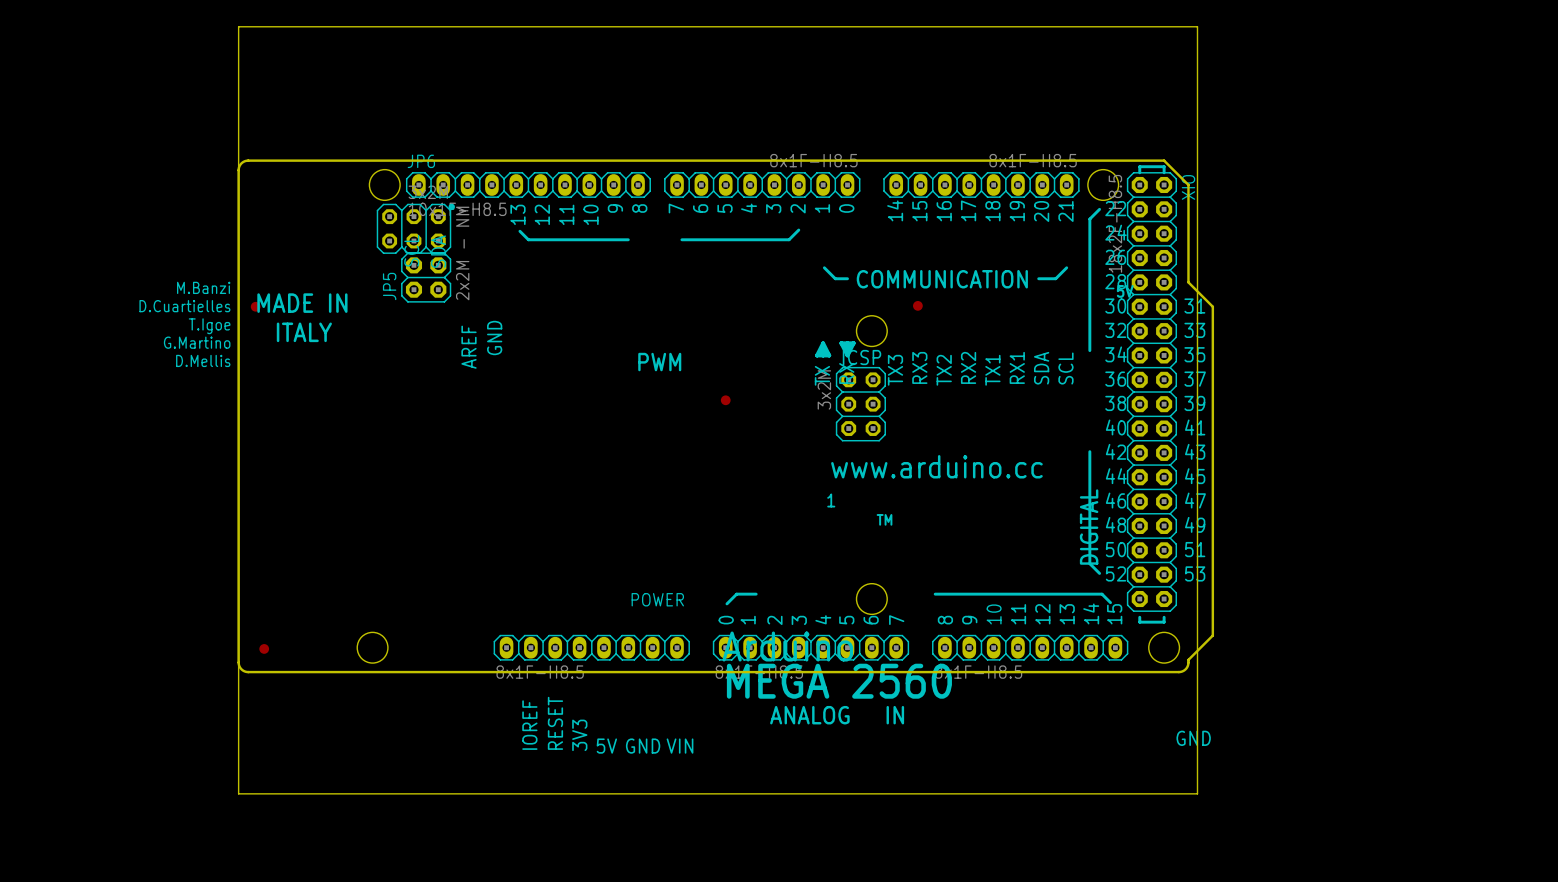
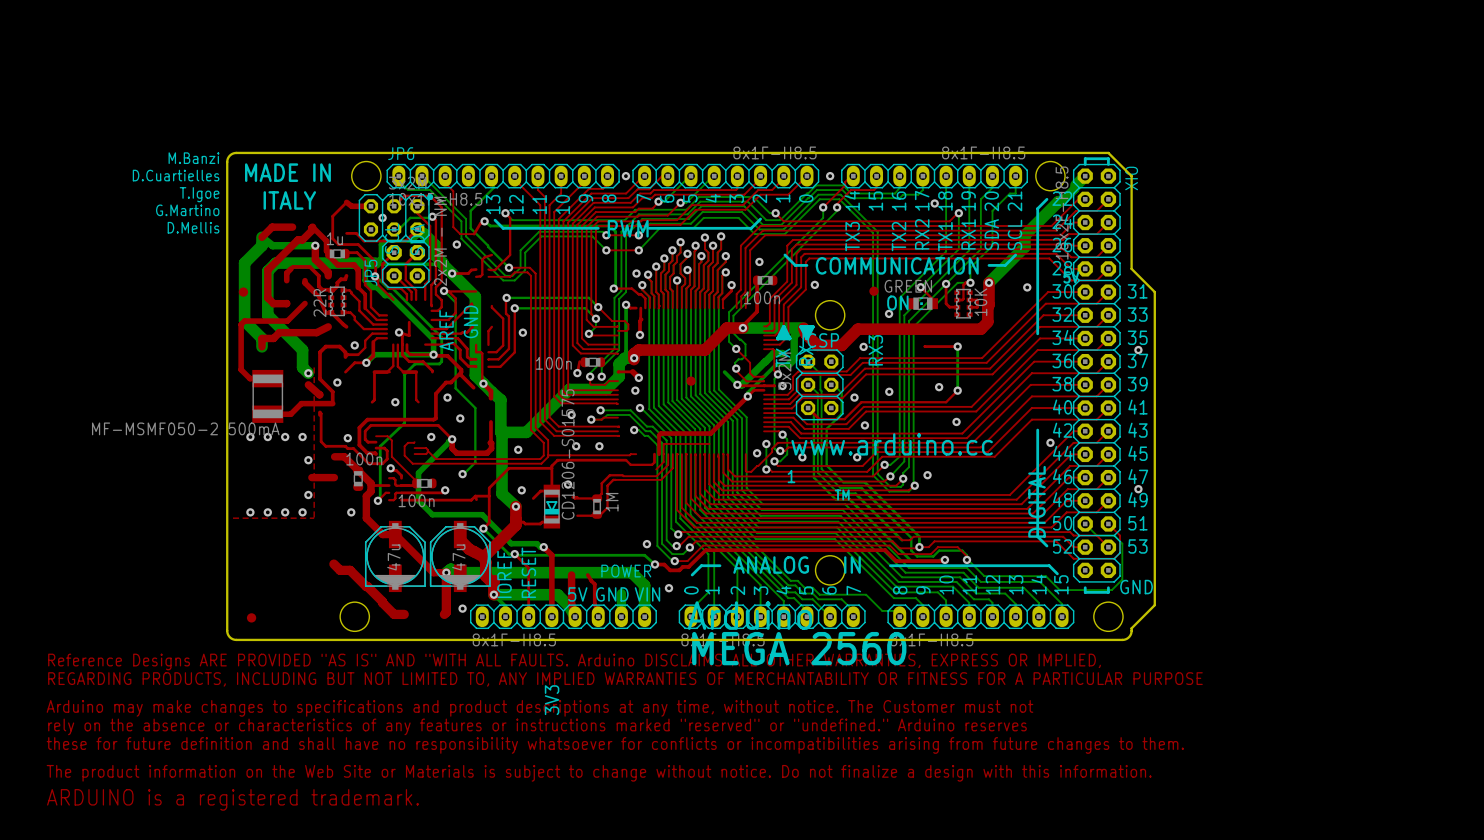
board edge: (238, 26) (238, 793) (1197, 793) (1197, 26) (238, 26) -> none
bottom track: none -> (398, 176) (398, 180) (408, 190) (430, 190) (461, 221) (461, 238) (503, 280) (514, 280) (525, 270) (525, 252) (541, 236) (592, 236) (606, 250)
bottom track: none -> (422, 176) (466, 219) (466, 236) (505, 275) (512, 275) (520, 267) (520, 250) (539, 231) (602, 231) (606, 235)
top track: none -> (445, 176) (445, 183) (453, 191) (453, 227) (460, 234) (474, 234) (480, 223) (484, 221)
bottom track: none -> (491, 176) (493, 187) (470, 210) (470, 228) (508, 267)
top track: none -> (514, 176) (517, 181) (540, 205) (540, 421) (554, 435) (619, 435)
top track: none -> (537, 176) (537, 190) (544, 197) (544, 419) (556, 431) (617, 431)
top track: none -> (561, 176) (561, 193) (549, 205) (549, 417) (558, 426) (617, 426)
top track: none -> (584, 176) (584, 181) (554, 212) (554, 396) (561, 403) (617, 403)
top track: none -> (607, 176) (607, 184) (602, 188) (588, 188) (558, 219) (558, 394) (564, 399) (617, 399)
via: none -> (625, 176)
top track: none -> (644, 176) (626, 193) (591, 193) (563, 221) (563, 391) (566, 394) (617, 394)
top track: none -> (667, 176) (662, 176) (649, 189) (637, 189) (628, 198) (592, 198) (568, 222) (568, 389) (617, 390)
bottom track: none -> (691, 176) (664, 201) (658, 201)
bottom track: none -> (714, 176) (686, 202) (680, 202)
top track: none -> (737, 176) (736, 190) (653, 190) (650, 193) (639, 193) (630, 202) (593, 202) (572, 223) (572, 345) (580, 353) (617, 353)
top track: none -> (760, 176) (760, 178) (744, 194) (655, 194) (651, 198) (642, 198) (633, 207) (594, 207) (577, 224) (577, 343) (583, 349) (617, 349)
top track: none -> (783, 176) (772, 190) (758, 190) (743, 205) (692, 205) (677, 220) (598, 221) (591, 228) (591, 314) (595, 318)
top track: none -> (806, 176) (788, 194) (760, 194) (745, 209) (695, 209) (680, 224) (599, 225) (595, 229) (595, 304) (612, 321) (624, 321) (628, 324) (626, 330) (617, 330)
via: none -> (830, 176)
top track: none -> (853, 176) (845, 181) (845, 185) (823, 207)
top track: none -> (876, 176) (876, 187) (874, 190) (851, 190) (837, 203) (837, 207)
bottom track: none -> (899, 176) (899, 187) (895, 193) (851, 193) (843, 185) (816, 185) (780, 220) (766, 220) (747, 201) (700, 201) (687, 214) (638, 214) (621, 231) (621, 290) (614, 297) (614, 348) (590, 373) (590, 376)
bottom track: none -> (922, 176) (922, 190) (918, 194) (903, 194) (899, 198) (850, 198) (842, 190) (816, 190) (781, 224) (762, 224) (744, 206) (701, 206) (688, 219) (642, 219) (626, 235) (626, 292) (619, 299) (619, 350) (601, 367) (601, 376)
bottom track: none -> (946, 176) (946, 251) (899, 297) (899, 456) (890, 464) (884, 464)
bottom track: none -> (969, 176) (969, 250) (904, 315) (904, 461) (890, 476)
bottom track: none -> (992, 176) (992, 187) (980, 199) (980, 249) (908, 321) (908, 467) (903, 472) (903, 484) (900, 486) (890, 486) (877, 474) (877, 231) (840, 194) (818, 194) (783, 229) (759, 229) (742, 212) (702, 212) (691, 223) (650, 223) (638, 235)
bottom track: none -> (1015, 176) (1015, 193) (1009, 193) (992, 210) (992, 245) (970, 267) (970, 282) (957, 282) (913, 326) (914, 485) (908, 491) (889, 491) (873, 475) (873, 232) (839, 199) (819, 199) (784, 234) (754, 234) (738, 217) (703, 217) (693, 228) (659, 228) (638, 250)
bottom track: none -> (1085, 176) (1064, 199) (1058, 201) (1024, 235) (1024, 246) (989, 282)
top track: none -> (1085, 199) (1078, 199) (1051, 225) (760, 225) (740, 245) (740, 289) (736, 293) (736, 308)
top track: none -> (1108, 199) (1096, 210) (1075, 210) (1056, 230) (762, 230) (745, 248) (745, 292) (741, 296) (741, 308)
top track: none -> (658, 201) (652, 208) (638, 208) (635, 212) (595, 212) (582, 225) (582, 338) (588, 344) (617, 344)
via: none -> (658, 201)
top track: none -> (680, 202) (667, 215) (597, 216) (586, 227) (586, 319) (593, 326) (617, 326)
via: none -> (680, 202)
via: none -> (934, 203)
top track: none -> (364, 206) (370, 206) (351, 206) (346, 202) (332, 216) (332, 238) (338, 244) (358, 244) (375, 261) (375, 277)
top track: none -> (394, 206) (404, 195) (430, 195) (441, 207) (441, 281) (435, 287) (435, 294) (441, 300) (441, 307) (438, 310) (431, 310)
top track: none -> (417, 206) (417, 213) (430, 225) (430, 279) (425, 284) (425, 299)
bottom track: none -> (823, 207) (823, 217) (729, 312) (729, 341) (736, 348)
via: none -> (823, 207)
bottom track: none -> (837, 207) (837, 210) (733, 315) (733, 333) (745, 344) (745, 355) (735, 362) (736, 368)
via: none -> (837, 207)
top track: none -> (505, 213) (510, 217) (510, 254) (495, 270) (488, 269)
bottom track: none -> (505, 213) (512, 220) (624, 220) (635, 209) (686, 209) (699, 197) (753, 197) (769, 213) (775, 213)
via: none -> (505, 213)
top track: none -> (775, 213) (783, 221) (949, 221) (958, 213)
via: none -> (775, 213)
bottom track: none -> (958, 213) (958, 249) (920, 287)
via: none -> (958, 213)
top track: none -> (432, 216) (435, 220) (435, 280) (431, 285) (431, 306)
bottom track: none -> (432, 216) (410, 217) (398, 229) (394, 229)
via: none -> (432, 216)
via: none -> (382, 217)
bottom track: none -> (484, 221) (490, 225) (609, 225) (615, 231) (615, 286) (613, 288)
via: none -> (484, 221)
top track: none -> (1085, 222) (1073, 222) (1060, 235) (765, 235) (750, 250) (750, 294) (745, 298) (745, 308)
top track: none -> (1108, 222) (1096, 234) (1069, 234) (1063, 239) (793, 239) (787, 245) (787, 281) (769, 298) (769, 323) (764, 326)
top track: none -> (292, 227) (272, 227) (262, 237)
top track: none -> (417, 229) (405, 241) (364, 241) (356, 233) (346, 233)
top track: none -> (606, 235) (638, 235)
via: none -> (606, 235)
via: none -> (638, 235)
top track: none -> (721, 236) (721, 249) (717, 252) (717, 263) (713, 267) (713, 290) (709, 294) (709, 308)
bottom track: none -> (721, 236) (721, 249) (717, 252) (717, 263) (713, 267) (713, 290) (709, 294) (709, 391) (737, 419) (737, 492) (760, 515) (840, 515) (902, 577) (960, 577) (976, 593) (1005, 593) (1015, 603) (1015, 616)
via: none -> (721, 236)
top track: none -> (704, 237) (704, 249) (708, 252) (708, 260) (703, 265) (703, 288) (700, 292) (700, 308)
bottom track: none -> (704, 237) (704, 249) (708, 252) (708, 260) (703, 265) (703, 288) (700, 292) (700, 394) (728, 421) (728, 497) (758, 527) (837, 527) (896, 586) (953, 586) (969, 602) (969, 616)
via: none -> (704, 237)
top track: none -> (680, 242) (680, 252) (673, 265) (673, 273) (670, 277) (672, 308)
bottom track: none -> (680, 242) (680, 252) (673, 265) (673, 273) (670, 277) (670, 288) (672, 290) (672, 401) (700, 428) (700, 510) (788, 598) (794, 598) (806, 610) (806, 616)
via: none -> (680, 242)
via: none -> (456, 244)
top track: none -> (315, 245) (315, 259) (328, 272) (328, 275)
bottom track: none -> (315, 245) (272, 245) (262, 237) (262, 245) (244, 263) (244, 321) (262, 338) (262, 346)
via: none -> (315, 245)
top track: none -> (695, 245) (694, 286) (691, 289) (691, 308)
bottom track: none -> (695, 245) (694, 286) (691, 289) (691, 396) (718, 424) (718, 501) (755, 539) (834, 539) (893, 598) (915, 598) (922, 605) (922, 616)
via: none -> (695, 245)
top track: none -> (713, 245) (713, 261) (708, 266) (708, 289) (704, 293) (704, 308)
bottom track: none -> (713, 245) (713, 261) (708, 266) (708, 289) (704, 293) (704, 392) (732, 420) (732, 494) (759, 521) (838, 521) (898, 581) (956, 581) (973, 599) (989, 599) (992, 602) (992, 616)
via: none -> (713, 245)
top track: none -> (1085, 245) (796, 244) (791, 249) (791, 282) (774, 300) (774, 329) (764, 330)
top track: none -> (1108, 245) (1096, 257) (1071, 257) (1063, 249) (801, 249) (796, 253) (796, 284) (779, 302) (779, 331) (775, 335) (764, 335)
top track: none -> (606, 250) (638, 250)
via: none -> (606, 250)
via: none -> (638, 250)
top track: none -> (672, 250) (672, 260) (668, 264) (668, 271) (665, 274) (668, 308)
bottom track: none -> (672, 250) (672, 260) (668, 264) (668, 271) (665, 274) (665, 289) (668, 292) (668, 402) (695, 429) (695, 512) (783, 600) (783, 617)
via: none -> (672, 250)
top track: none -> (394, 252) (382, 264) (382, 281) (389, 288) (401, 288) (406, 294) (406, 299)
top track: none -> (417, 252) (405, 264) (405, 280) (416, 290) (416, 299)
part: none -> 1u (337, 253)
top track: none -> (345, 253) (357, 252) (365, 260) (365, 285) (370, 290) (370, 307) (379, 315) (386, 315)
top track: none -> (687, 253) (687, 257) (680, 264) (680, 273) (685, 278) (685, 283) (681, 287) (681, 308)
bottom track: none -> (687, 253) (687, 257) (680, 264) (680, 273) (685, 278) (685, 283) (681, 287) (681, 398) (709, 426) (709, 506) (788, 585) (795, 585) (803, 593) (812, 593) (818, 599) (841, 599) (853, 610)
via: none -> (687, 253)
top track: none -> (491, 254) (482, 259) (482, 274) (476, 276)
top track: none -> (701, 256) (701, 261) (699, 264) (699, 287) (695, 290) (695, 308)
bottom track: none -> (701, 256) (701, 261) (699, 264) (699, 287) (695, 290) (695, 395) (723, 423) (723, 499) (757, 533) (835, 533) (895, 592) (937, 592) (946, 600) (946, 616)
via: none -> (701, 256)
top track: none -> (725, 256) (725, 261) (717, 270) (717, 292) (713, 295) (713, 308)
bottom track: none -> (725, 256) (725, 261) (717, 270) (717, 292) (714, 295) (714, 390) (742, 418) (742, 490) (761, 510) (842, 510) (905, 572) (963, 572) (978, 587) (1023, 587) (1038, 602) (1038, 616)
via: none -> (725, 256)
top track: none -> (664, 258) (664, 270) (660, 273) (663, 308)
bottom track: none -> (664, 258) (664, 270) (660, 273) (660, 290) (663, 294) (663, 404) (690, 431) (690, 514) (760, 584) (760, 616)
via: none -> (664, 258)
via: none -> (759, 261)
bottom track: none -> (365, 263) (365, 280) (372, 287) (376, 287) (384, 295) (389, 295) (433, 339) (433, 354) (374, 354) (366, 362)
bottom track: none -> (375, 263) (275, 263) (267, 271) (267, 315) (302, 350) (302, 367) (308, 373)
bottom track: none -> (375, 263) (381, 258) (381, 244) (384, 241) (411, 241) (417, 235) (417, 229) (435, 245) (435, 256) (442, 263)
bottom track: none -> (375, 263) (442, 263)
bottom track: none -> (442, 263) (475, 296) (475, 375) (500, 399) (500, 432) (526, 432) (569, 389) (606, 389) (619, 376) (619, 363) (624, 358) (634, 359) (626, 351) (626, 304)
top track: none -> (656, 266) (658, 308)
bottom track: none -> (656, 266) (656, 292) (658, 294) (658, 405) (685, 432) (685, 517) (737, 568) (737, 616)
via: none -> (656, 266)
top track: none -> (508, 267) (529, 267) (535, 273) (535, 427) (548, 440) (548, 456) (541, 463) (412, 463) (404, 455) (404, 446) (408, 442) (414, 442)
via: none -> (508, 267)
top track: none -> (1085, 268) (1071, 268) (1056, 253) (804, 253) (801, 257) (801, 287) (783, 304) (783, 333) (777, 340) (764, 340)
top track: none -> (1108, 268) (1096, 280) (1071, 280) (1049, 258) (809, 258) (805, 261) (805, 289) (788, 307) (788, 336) (779, 344) (764, 344)
top track: none -> (476, 269) (471, 270) (468, 273) (452, 273)
top track: none -> (687, 270) (689, 272) (689, 285) (686, 288) (686, 308)
bottom track: none -> (687, 270) (689, 272) (689, 285) (686, 288) (686, 397) (714, 425) (714, 504) (790, 580) (797, 580) (804, 587) (812, 587) (819, 594) (866, 594) (882, 610) (899, 610) (899, 616)
via: none -> (687, 270)
top track: none -> (725, 272) (722, 275) (722, 293) (718, 297) (718, 308)
bottom track: none -> (725, 272) (722, 275) (722, 293) (718, 296) (718, 389) (746, 417) (746, 488) (762, 504) (845, 504) (908, 568) (966, 568) (980, 581) (1040, 581) (1062, 603) (1062, 616)
via: none -> (725, 272)
text position: M.Banzi (203, 287) -> M.Banzi (193, 158)
via: none -> (452, 273)
via: none -> (636, 273)
top track: none -> (648, 274) (648, 278) (651, 281) (651, 293) (654, 296) (654, 308)
bottom track: none -> (648, 274) (648, 278) (651, 281) (651, 293) (653, 295) (653, 407) (680, 434) (680, 518) (714, 552) (714, 616)
via: none -> (648, 274)
top track: none -> (346, 275) (345, 279) (340, 279) (337, 282) (337, 286) (333, 290) (322, 289) (318, 286) (318, 275) (309, 266) (292, 266) (286, 273) (286, 280)
top track: none -> (394, 275) (411, 292) (411, 299)
top track: none -> (375, 276) (377, 279) (377, 284) (393, 299)
bottom track: none -> (375, 276) (388, 288) (392, 288) (441, 337) (441, 361) (439, 363) (415, 363) (404, 374) (404, 423) (380, 446) (380, 500) (377, 500)
via: none -> (375, 276)
top track: none -> (488, 276) (510, 276) (514, 272) (527, 272) (531, 275) (531, 430) (543, 442) (543, 455) (540, 459) (435, 459) (427, 450)
top track: none -> (305, 280) (318, 296) (325, 312) (331, 312) (346, 326)
top track: none -> (677, 280) (677, 308)
bottom track: none -> (677, 280) (677, 399) (704, 427) (704, 507) (788, 592) (795, 592) (802, 599) (812, 599) (830, 616)
via: none -> (677, 280)
top track: none -> (757, 280) (757, 311) (742, 328) (726, 328) (704, 350) (638, 350) (633, 353) (633, 361) (634, 358)
part: none -> 100n (765, 280)
top track: none -> (970, 282) (963, 285) (963, 299) (957, 300)
via: none -> (970, 282)
top track: none -> (989, 282) (987, 322) (980, 329) (857, 329) (841, 345) (817, 345) (805, 333) (803, 328)
via: none -> (989, 282)
top track: none -> (946, 283) (946, 303) (949, 307) (957, 307)
via: none -> (946, 283)
top track: none -> (642, 285) (642, 289) (649, 297) (649, 308)
bottom track: none -> (642, 285) (642, 289) (649, 296) (649, 409) (675, 435) (675, 521) (708, 554) (708, 592) (691, 609) (691, 616)
via: none -> (642, 285)
top track: none -> (731, 285) (731, 290) (722, 299) (723, 308)
via: none -> (731, 285)
via: none -> (814, 284)
top track: none -> (920, 287) (932, 298) (932, 303)
via: none -> (920, 287)
via: none -> (1027, 287)
text position: MADE IN (302, 303) -> MADE IN (287, 172)
top track: none -> (613, 288) (631, 288) (645, 298) (645, 308)
via: none -> (613, 288)
top track: none -> (343, 290) (349, 290) (359, 301) (359, 310) (373, 324) (386, 324)
top track: none -> (444, 290) (476, 291)
bottom track: none -> (444, 290) (455, 302) (455, 388) (475, 408) (475, 462) (462, 474)
via: none -> (444, 290)
text position: D.Cuartielles (184, 306) -> D.Cuartielles (176, 175)
top track: none -> (448, 291) (455, 298) (455, 312) (448, 319) (431, 319)
top track: none -> (1085, 292) (1048, 292) (982, 358) (860, 358) (846, 371) (798, 371) (793, 376) (793, 389) (787, 394) (764, 394)
top track: none -> (1108, 292) (1096, 303) (1045, 303) (986, 362) (862, 362) (850, 374) (800, 374) (797, 377) (797, 390) (788, 399) (764, 399)
top track: none -> (506, 297) (508, 348) (498, 359) (488, 359)
bottom track: none -> (506, 297) (588, 297) (598, 307)
via: none -> (506, 297)
top track: none -> (969, 300) (977, 300) (977, 307) (969, 307)
part: none -> 22R (337, 301)
top track: none -> (286, 303) (273, 303) (267, 297) (267, 270) (297, 239) (302, 239) (311, 230) (312, 227) (326, 241) (328, 255) (337, 264) (354, 264) (358, 270) (358, 287) (365, 294) (365, 308) (376, 319) (386, 319)
top track: none -> (305, 303) (287, 321) (244, 321) (241, 324) (241, 369) (249, 378) (267, 378)
ON: none -> GREEN (922, 303)
part: none -> 10K (963, 303)
top track: none -> (626, 304) (630, 308) (636, 308)
via: none -> (626, 304)
top track: none -> (472, 305) (471, 303) (446, 329) (431, 329)
top track: none -> (491, 305) (503, 318) (503, 345) (496, 352) (488, 352)
via: none -> (598, 307)
top track: none -> (514, 308) (514, 352) (500, 366) (488, 366)
bottom track: none -> (514, 308) (585, 308) (595, 318) (595, 326) (588, 333)
via: none -> (514, 308)
top track: none -> (640, 308) (639, 334)
text position: T.Igoe (209, 326) -> T.Igoe (199, 194)
top track: none -> (343, 312) (350, 312) (363, 329) (386, 329)
via: none -> (889, 313)
top track: none -> (1085, 315) (1043, 315) (990, 368) (864, 368) (838, 394) (799, 394) (790, 403) (764, 403)
top track: none -> (1108, 315) (1096, 326) (1040, 326) (992, 374) (866, 374) (842, 398) (802, 398) (791, 408) (764, 408)
text position: ITALY (304, 332) -> ITALY (289, 200)
via: none -> (595, 318)
top track: none -> (409, 322) (409, 335) (399, 332)
text position: G.Martino (197, 342) -> G.Martino (187, 210)
top track: none -> (328, 326) (316, 332) (279, 332) (273, 338) (262, 338) (262, 346)
top track: none -> (472, 326) (467, 332) (461, 333) (431, 333)
top track: none -> (491, 326) (488, 331) (488, 344)
bottom track: none -> (742, 328) (803, 328) (794, 336) (794, 359) (788, 365) (775, 365) (747, 392) (747, 396)
via: none -> (742, 328)
top track: none -> (399, 332) (402, 335) (402, 354) (409, 361) (423, 361) (432, 372)
via: none -> (399, 332)
via: none -> (522, 332)
top track: none -> (386, 333) (372, 333) (365, 340) (365, 347) (358, 354) (347, 354) (345, 357) (345, 352) (339, 346) (325, 346) (319, 352) (319, 379) (332, 391) (332, 403) (301, 403) (290, 414) (267, 414)
top track: none -> (588, 333) (591, 336) (617, 335)
via: none -> (588, 333)
via: none -> (639, 334)
top track: none -> (386, 338) (377, 338) (373, 341) (373, 355) (366, 362) (354, 362) (345, 372)
top track: none -> (431, 338) (457, 338) (467, 348) (467, 357) (476, 359)
top track: none -> (1085, 338) (1040, 338) (971, 406) (863, 406) (846, 424) (806, 424) (795, 413) (764, 413)
top track: none -> (1108, 338) (1096, 350) (1037, 350) (976, 411) (866, 411) (848, 428) (804, 428) (793, 417) (764, 417)
text position: D.Mellis (203, 360) -> D.Mellis (193, 227)
top track: none -> (393, 344) (393, 366) (387, 372)
top track: none -> (397, 344) (397, 366) (403, 372) (416, 372) (416, 399) (418, 402)
top track: none -> (406, 344) (406, 351) (410, 354) (447, 355) (461, 369) (461, 372)
top track: none -> (425, 344) (453, 343) (460, 350) (460, 358) (468, 366) (476, 366)
via: none -> (354, 345)
top track: none -> (476, 344) (476, 352) (482, 353) (482, 382) (490, 391) (490, 398)
text position: PWM (659, 362) -> PWM (628, 228)
top track: none -> (924, 346) (957, 346)
bottom track: none -> (957, 346) (957, 390)
via: none -> (957, 346)
via: none -> (863, 346)
top track: none -> (736, 348) (750, 362) (750, 373) (753, 376) (764, 376)
via: none -> (736, 348)
top track: none -> (764, 349) (774, 350) (774, 370) (777, 374)
text position: RX2 (968, 367) -> RX2 (922, 234)
text position: RX1 (1017, 367) -> RX1 (968, 234)
via: none -> (1138, 350)
text position: SDA (1041, 368) -> SDA (991, 234)
text position: SCL (1065, 368) -> SCL (1014, 234)
text position: TX3 (895, 370) -> TX3 (852, 236)
text position: TX2 (944, 370) -> TX2 (899, 236)
text position: TX1 (992, 370) -> TX1 (945, 236)
bottom track: none -> (782, 353) (773, 353) (742, 384) (737, 384) (724, 372)
via: none -> (433, 354)
via: none -> (634, 358)
top track: none -> (579, 361) (577, 373)
bottom track: none -> (808, 361) (820, 373) (821, 469) (840, 488) (861, 488) (911, 537) (911, 550) (917, 556) (933, 556) (939, 550) (962, 550) (966, 555) (966, 559) (984, 576) (1045, 576) (1059, 590) (1111, 590) (1122, 579) (1122, 543) (1114, 535) (1096, 535) (1085, 523)
top track: none -> (1085, 361) (1034, 361) (962, 433) (801, 433) (791, 422) (764, 422)
top track: none -> (1108, 361) (1096, 373) (1031, 373) (966, 438) (800, 438) (788, 426) (764, 426)
part: none -> 100n (592, 362)
via: none -> (366, 362)
top zone outline: none -> (314, 367) (314, 518) (233, 518)
top track: none -> (736, 368) (746, 381) (764, 381)
via: none -> (736, 368)
top track: none -> (387, 372) (389, 372)
top track: none -> (387, 372) (374, 372) (374, 399) (372, 402)
top track: none -> (461, 372) (460, 374) (473, 387)
top track: none -> (461, 372) (451, 382) (446, 382) (435, 393) (435, 418) (367, 419) (359, 427) (359, 445) (367, 453) (376, 454)
top track: none -> (617, 372) (632, 371) (638, 377)
via: none -> (577, 373)
via: none -> (308, 373)
bottom track: none -> (777, 374) (774, 379) (774, 448) (780, 450)
via: none -> (777, 374)
top track: none -> (590, 376) (591, 384) (605, 384) (608, 381) (617, 381)
via: none -> (590, 376)
via: none -> (601, 376)
via: none -> (638, 377)
via: none -> (337, 382)
via: none -> (483, 383)
top track: none -> (308, 384) (319, 394)
via: none -> (737, 384)
bottom track: none -> (808, 384) (817, 393) (817, 472) (838, 493) (855, 493) (902, 540)
bottom track: none -> (831, 384) (841, 392) (841, 413) (826, 428) (826, 465) (843, 482) (864, 482) (919, 536) (919, 547)
top track: none -> (1085, 384) (1030, 384) (972, 442) (777, 442) (772, 448) (772, 452) (751, 471) (745, 470) (745, 454)
top track: none -> (1108, 384) (1096, 396) (1031, 396) (980, 447) (788, 447) (784, 450) (780, 450)
top track: none -> (737, 386) (774, 386)
via: none -> (782, 386)
via: none -> (939, 387)
top track: none -> (764, 390) (754, 390) (710, 433) (660, 433) (659, 435) (659, 454)
via: none -> (635, 390)
top track: none -> (957, 390) (946, 402) (861, 402) (844, 419) (819, 419) (808, 408)
via: none -> (957, 390)
via: none -> (889, 391)
part: none -> MF-MSMF050-2 500mA (267, 396)
via: none -> (747, 396)
via: none -> (447, 397)
via: none -> (854, 397)
via: none -> (395, 402)
bottom track: none -> (639, 408) (671, 438) (671, 528) (678, 534)
via: none -> (639, 408)
bottom track: none -> (808, 408) (813, 413) (813, 477) (835, 499) (849, 499) (911, 561) (944, 559)
top track: none -> (1085, 408) (1031, 408) (987, 452) (876, 452) (862, 466) (777, 466) (774, 461)
top track: none -> (1108, 408) (1096, 419) (1031, 419) (994, 456) (882, 456) (867, 471) (772, 471) (766, 469)
bottom track: none -> (600, 410) (630, 410) (646, 426) (652, 426) (666, 440) (666, 540) (672, 546) (676, 546)
via: none -> (600, 410)
top track: none -> (319, 414) (319, 412) (321, 441) (325, 446) (345, 446) (347, 448) (353, 448) (368, 463) (382, 463) (387, 459) (387, 450) (384, 448) (376, 448)
via: none -> (571, 414)
top track: none -> (617, 417) (591, 419)
via: none -> (460, 418)
bottom track: none -> (591, 419) (601, 419) (607, 414) (629, 414) (645, 431) (650, 431) (662, 442) (662, 543) (672, 554) (683, 554) (689, 547)
via: none -> (591, 419)
top track: none -> (490, 421) (491, 448) (486, 453) (456, 453) (452, 448) (452, 439) (438, 425) (370, 425) (365, 431) (365, 439) (368, 442) (376, 442)
via: none -> (956, 421)
via: none -> (864, 425)
bottom track: none -> (634, 430) (638, 430) (644, 435) (648, 435) (657, 445) (657, 546) (672, 561) (674, 561)
via: none -> (634, 430)
top track: none -> (1085, 431) (1073, 431) (1009, 494) (720, 494) (709, 484) (709, 454)
top track: none -> (1108, 431) (1096, 442) (1073, 442) (1016, 499) (715, 499) (704, 489) (704, 454)
top track: none -> (764, 431) (779, 431) (782, 434)
bottom track: none -> (502, 432) (502, 493) (515, 506)
bottom track: none -> (782, 434) (787, 439) (787, 454) (780, 461) (774, 461)
via: none -> (782, 434)
via: none -> (250, 437)
via: none -> (267, 437)
via: none -> (285, 437)
via: none -> (302, 437)
top track: none -> (376, 436) (387, 436) (391, 440) (391, 456) (416, 481) (416, 483) (414, 485) (396, 485) (395, 479) (389, 478)
via: none -> (431, 437)
via: none -> (347, 438)
bottom track: none -> (452, 439) (418, 472) (418, 500) (432, 514) (482, 514) (511, 543) (536, 543) (540, 547) (543, 547)
via: none -> (452, 439)
via: none -> (1050, 442)
top track: none -> (709, 443) (664, 443) (663, 462) (656, 469)
bottom track: none -> (766, 443) (766, 469)
via: none -> (766, 443)
via: none -> (576, 446)
via: none -> (599, 446)
top track: none -> (414, 448) (427, 449) (426, 454) (414, 454)
via: none -> (518, 449)
via: none -> (780, 450)
top track: none -> (636, 454) (548, 455)
top track: none -> (654, 454) (654, 462) (652, 464) (630, 464) (626, 460) (557, 460) (551, 466) (551, 491) (540, 491) (533, 498)
top track: none -> (668, 454) (668, 464) (656, 476) (609, 475) (601, 483) (601, 493) (597, 498) (573, 497)
top track: none -> (672, 454) (672, 468) (661, 479) (613, 479) (607, 485) (607, 507) (600, 514) (577, 515)
top track: none -> (677, 454) (677, 510) (694, 527) (1051, 527) (1066, 512) (1096, 512) (1108, 500)
top track: none -> (681, 454) (681, 507) (696, 522) (1044, 522) (1066, 500) (1085, 500)
top track: none -> (686, 454) (686, 503) (701, 518) (1038, 518) (1067, 489) (1096, 489) (1108, 477)
top track: none -> (691, 454) (691, 498) (706, 513) (1033, 513) (1069, 477) (1085, 477)
top track: none -> (695, 454) (695, 496) (708, 508) (1027, 508) (1070, 466) (1096, 466) (1108, 454)
top track: none -> (700, 454) (700, 493) (710, 504) (1021, 504) (1071, 454) (1085, 454)
top track: none -> (713, 454) (713, 481) (722, 490) (908, 490) (914, 485)
top track: none -> (718, 454) (718, 479) (724, 485) (896, 485) (903, 478)
top track: none -> (722, 454) (723, 472) (732, 481) (884, 481) (890, 476)
top track: none -> (727, 454) (728, 469) (735, 476) (873, 476) (884, 464)
via: none -> (757, 453)
top track: none -> (334, 456) (344, 456) (370, 483)
via: none -> (802, 457)
via: none -> (857, 457)
via: none -> (308, 460)
via: none -> (774, 461)
via: none -> (884, 464)
top track: none -> (390, 468) (396, 470) (401, 478)
via: none -> (390, 468)
top track: none -> (551, 468) (508, 468) (489, 488) (489, 522) (483, 528)
via: none -> (766, 469)
via: none -> (462, 474)
via: none -> (927, 475)
via: none -> (890, 476)
top track: none -> (311, 477) (334, 477)
part: none -> 100n (358, 478)
via: none -> (903, 478)
top track: none -> (370, 483) (370, 491) (366, 496) (366, 518) (382, 534) (395, 534) (433, 572) (446, 572) (446, 612) (444, 614)
top track: none -> (370, 483) (373, 485) (389, 485)
part: none -> 100n (424, 483)
via: none -> (568, 484)
via: none -> (914, 485)
via: none -> (1138, 489)
top track: none -> (445, 490) (442, 492) (396, 492) (395, 498) (389, 500)
via: none -> (445, 490)
via: none -> (521, 490)
top track: none -> (389, 492) (385, 492) (378, 500)
via: none -> (308, 494)
top track: none -> (475, 496) (489, 496)
top track: none -> (475, 496) (476, 499)
top track: none -> (475, 496) (471, 500) (401, 500)
top track: none -> (572, 497) (577, 497)
via: none -> (377, 500)
top track: none -> (515, 506) (515, 525) (484, 557)
via: none -> (515, 506)
part: none -> CD1206-S01575 (551, 506)
part: none -> 1M (597, 506)
via: none -> (250, 512)
via: none -> (267, 512)
via: none -> (285, 512)
via: none -> (302, 512)
via: none -> (351, 512)
top track: none -> (515, 519) (525, 523) (551, 522)
top track: none -> (1108, 523) (1120, 535) (1120, 552) (1114, 558) (1073, 558) (1056, 541) (934, 541) (928, 547) (918, 548) (899, 548) (892, 541) (695, 541) (689, 547)
bottom track: none -> (483, 528) (508, 554) (644, 555) (654, 564)
via: none -> (483, 528)
top track: none -> (460, 534) (460, 540) (469, 549) (484, 557)
top track: none -> (678, 534) (681, 532) (1070, 532) (1073, 535) (1096, 535) (1108, 547)
via: none -> (678, 534)
via: none -> (646, 544)
top track: none -> (676, 546) (679, 546) (688, 536) (898, 536) (902, 540) (910, 540) (913, 536) (1063, 536) (1073, 547) (1085, 547)
via: none -> (676, 546)
top track: none -> (543, 547) (551, 555) (551, 616)
via: none -> (543, 547)
via: none -> (689, 547)
via: none -> (919, 547)
top track: none -> (514, 554) (528, 568) (528, 616)
via: none -> (514, 554)
part: none -> 47u (395, 556)
part: none -> 47u (460, 556)
top track: none -> (484, 557) (485, 576) (490, 580) (493, 580) (493, 594)
top track: none -> (944, 559) (896, 561) (885, 550) (705, 550) (688, 566) (682, 566) (679, 570) (670, 570) (664, 564) (654, 564)
via: none -> (944, 559)
top track: none -> (966, 559) (966, 556) (957, 547) (937, 547) (931, 554) (898, 554) (889, 545) (703, 545) (687, 561) (674, 561)
via: none -> (966, 559)
via: none -> (674, 561)
top track: none -> (333, 564) (340, 570) (350, 570) (394, 614) (404, 614)
via: none -> (654, 564)
bottom track: none -> (446, 572) (451, 569) (454, 572) (631, 572) (644, 585) (644, 616)
via: none -> (446, 572)
top track: none -> (571, 574) (571, 603) (575, 616)
top track: none -> (587, 574) (594, 584) (594, 603) (598, 616)
via: none -> (668, 588)
bottom track: none -> (621, 593) (621, 616)
via: none -> (493, 594)
via: none -> (462, 608)
bottom track: none -> (505, 616) (505, 606) (493, 594) (557, 594) (569, 606) (575, 616)
drawing: none -> [46, 653, 1203, 811]
text position: ANALOG IN (837, 715) -> ANALOG IN (797, 565)
text position: RESET (555, 723) -> RESET (528, 572)
text position: IOREF (529, 725) -> IOREF (504, 574)
text position: GND (1193, 738) -> GND (1136, 587)
text position: 5V (606, 746) -> 5V (577, 594)
text position: GND (643, 746) -> GND (612, 594)
text position: VIN (680, 746) -> VIN (647, 594)

